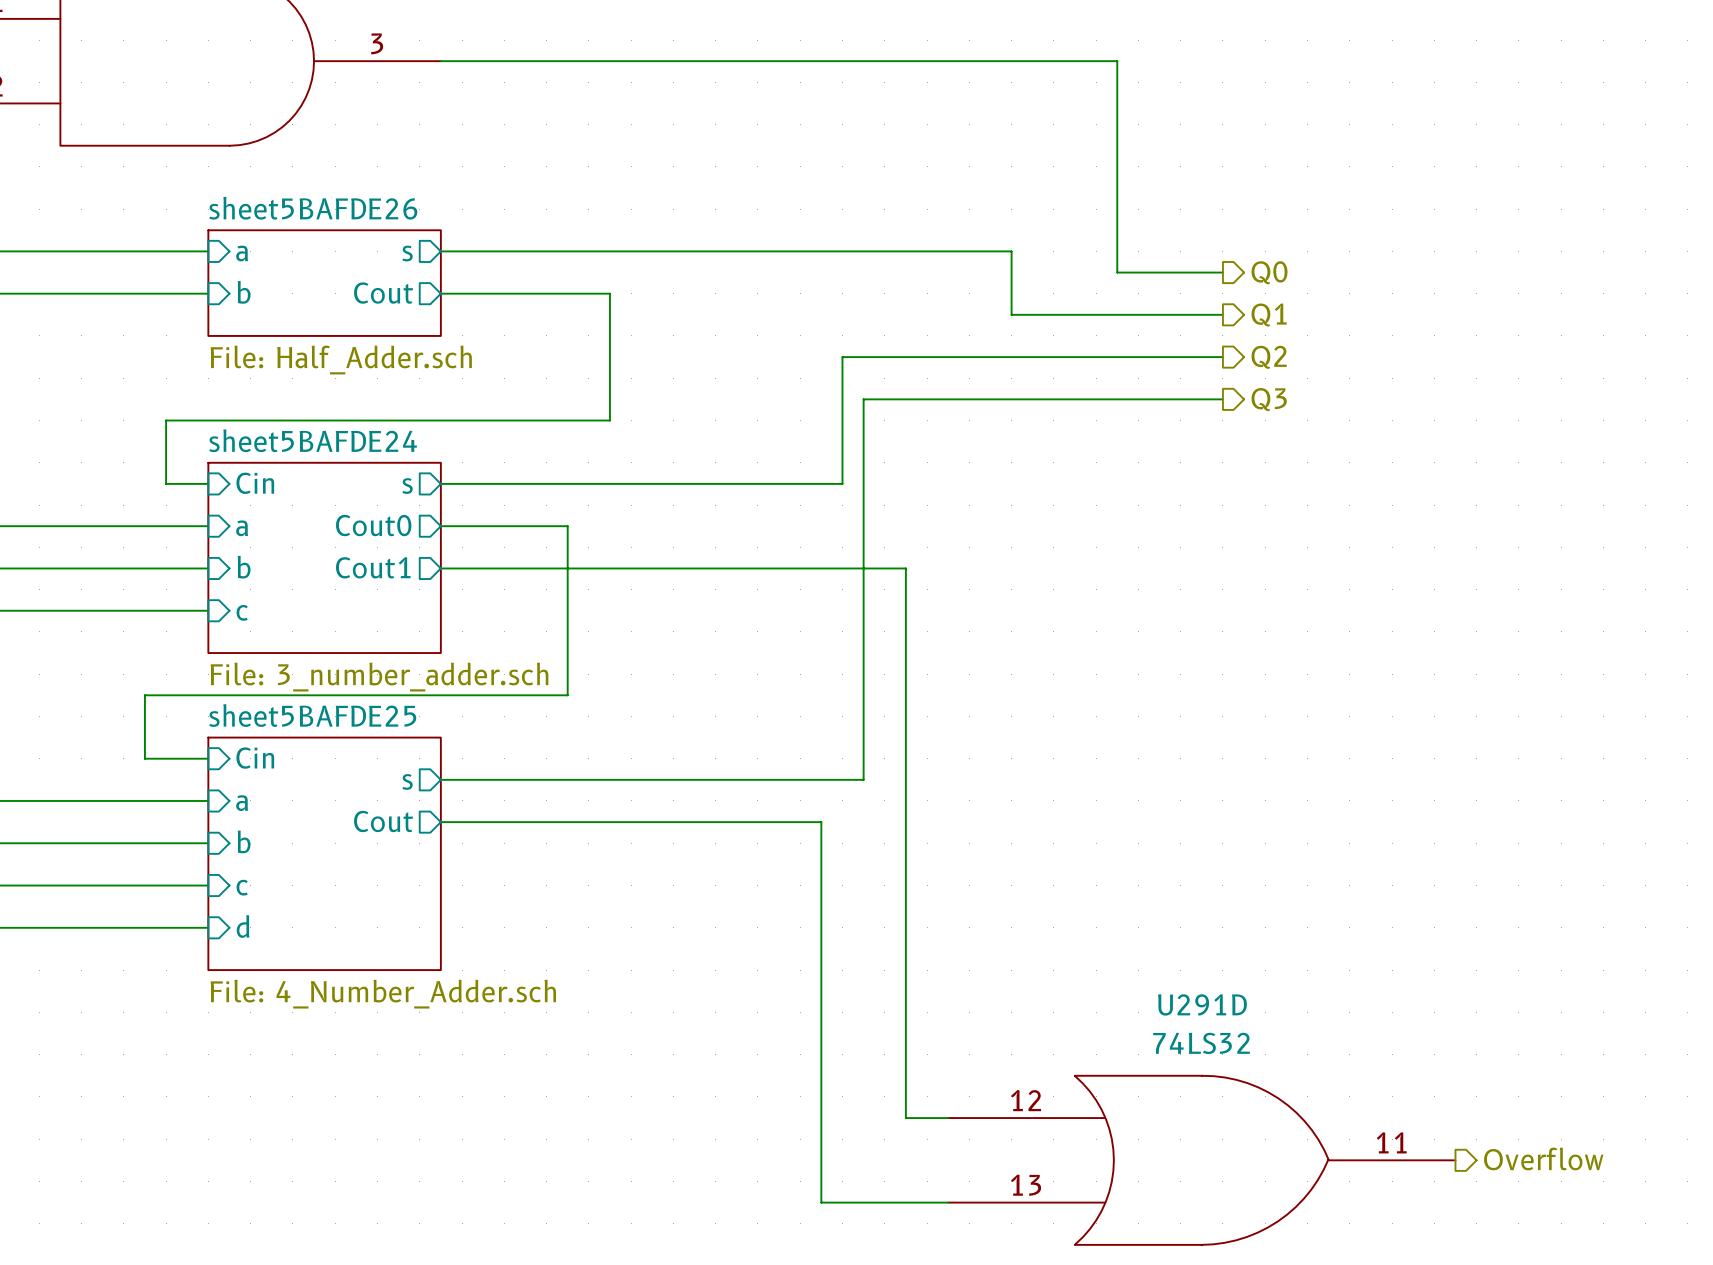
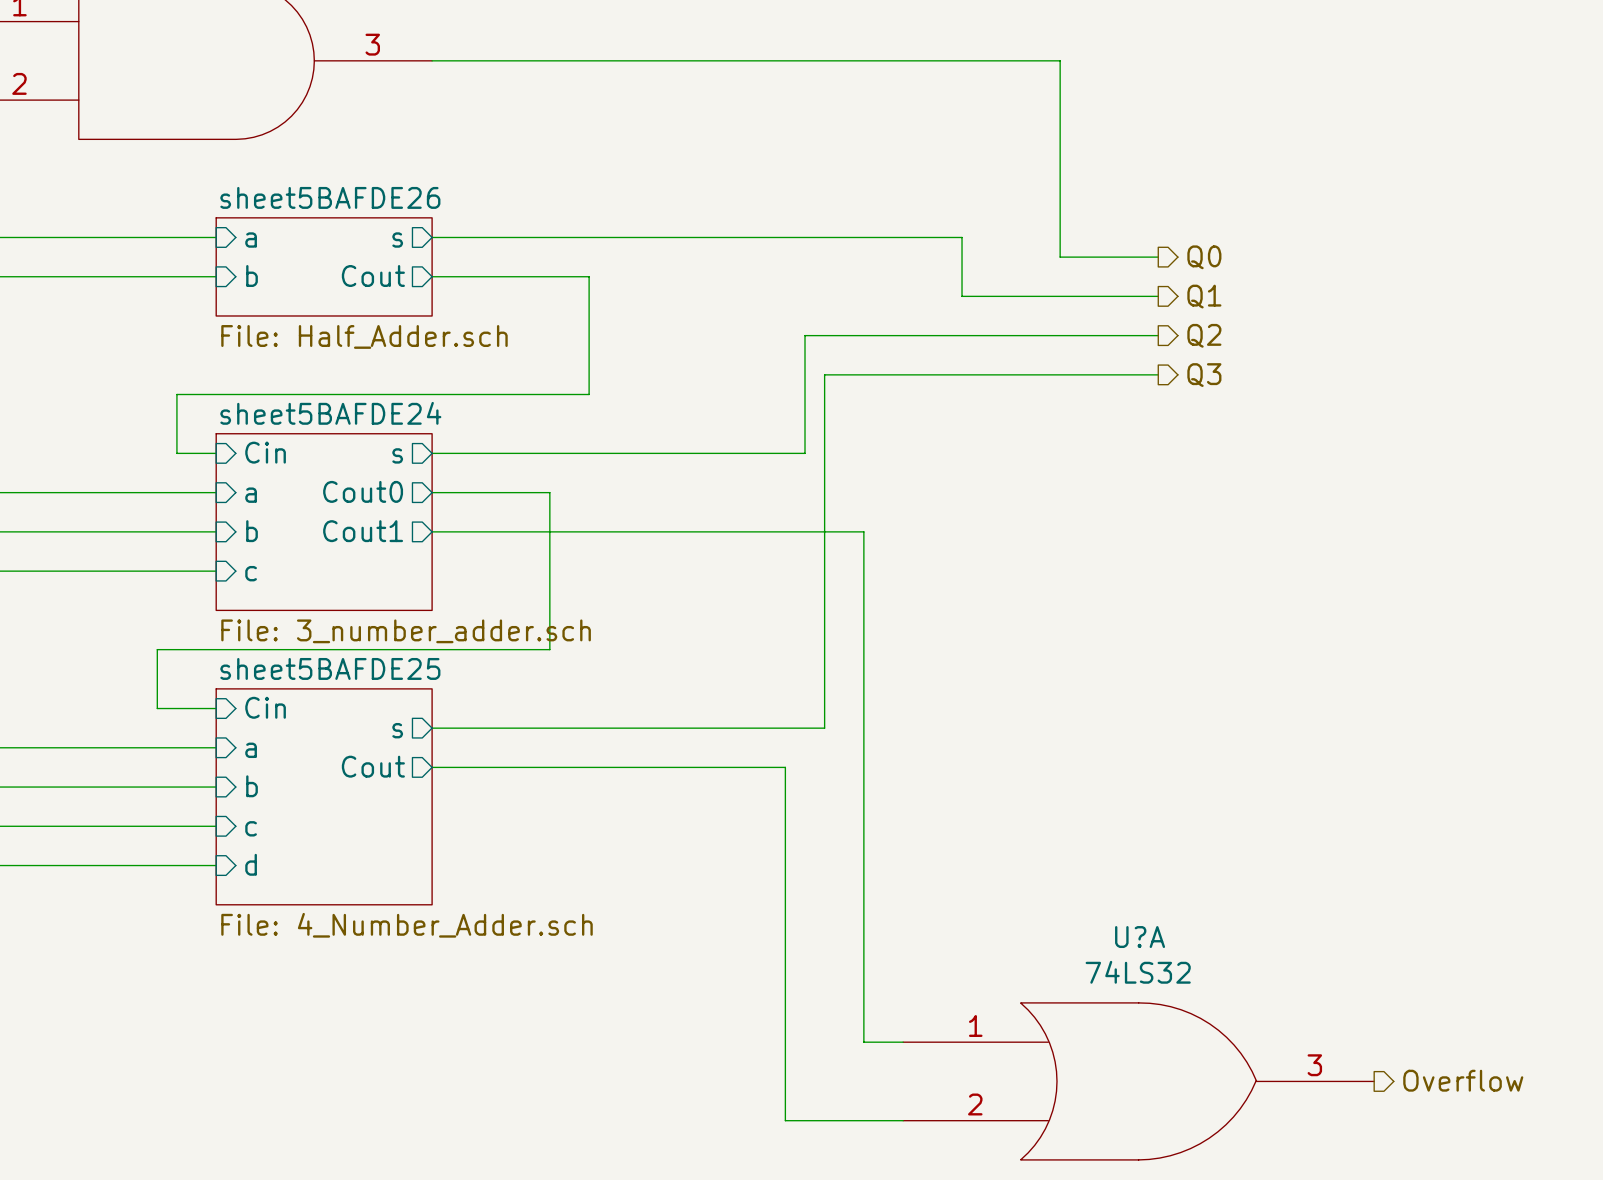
U291D name: U291D (1202, 1004) -> U?A (1140, 937)
U291D pin number: 12 (1026, 1100) -> 1 (975, 1025)
U291D pin number: 11 (1391, 1142) -> 3 (1314, 1065)
U291D pin number: 13 (1026, 1185) -> 2 (975, 1104)

